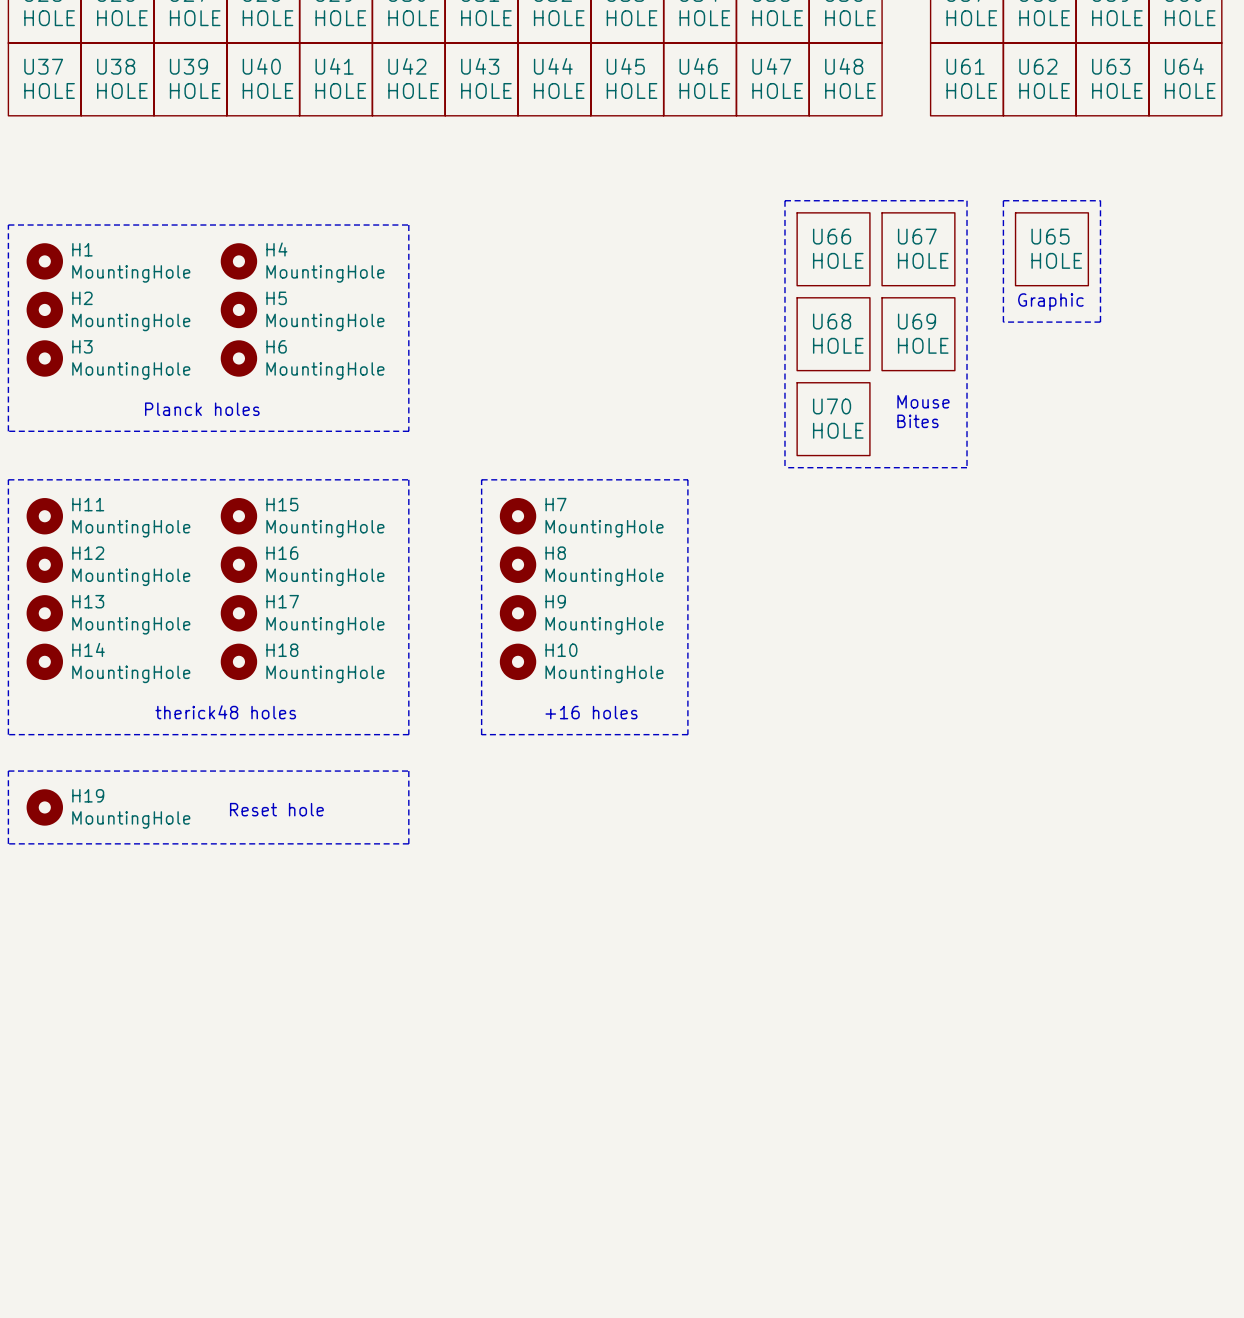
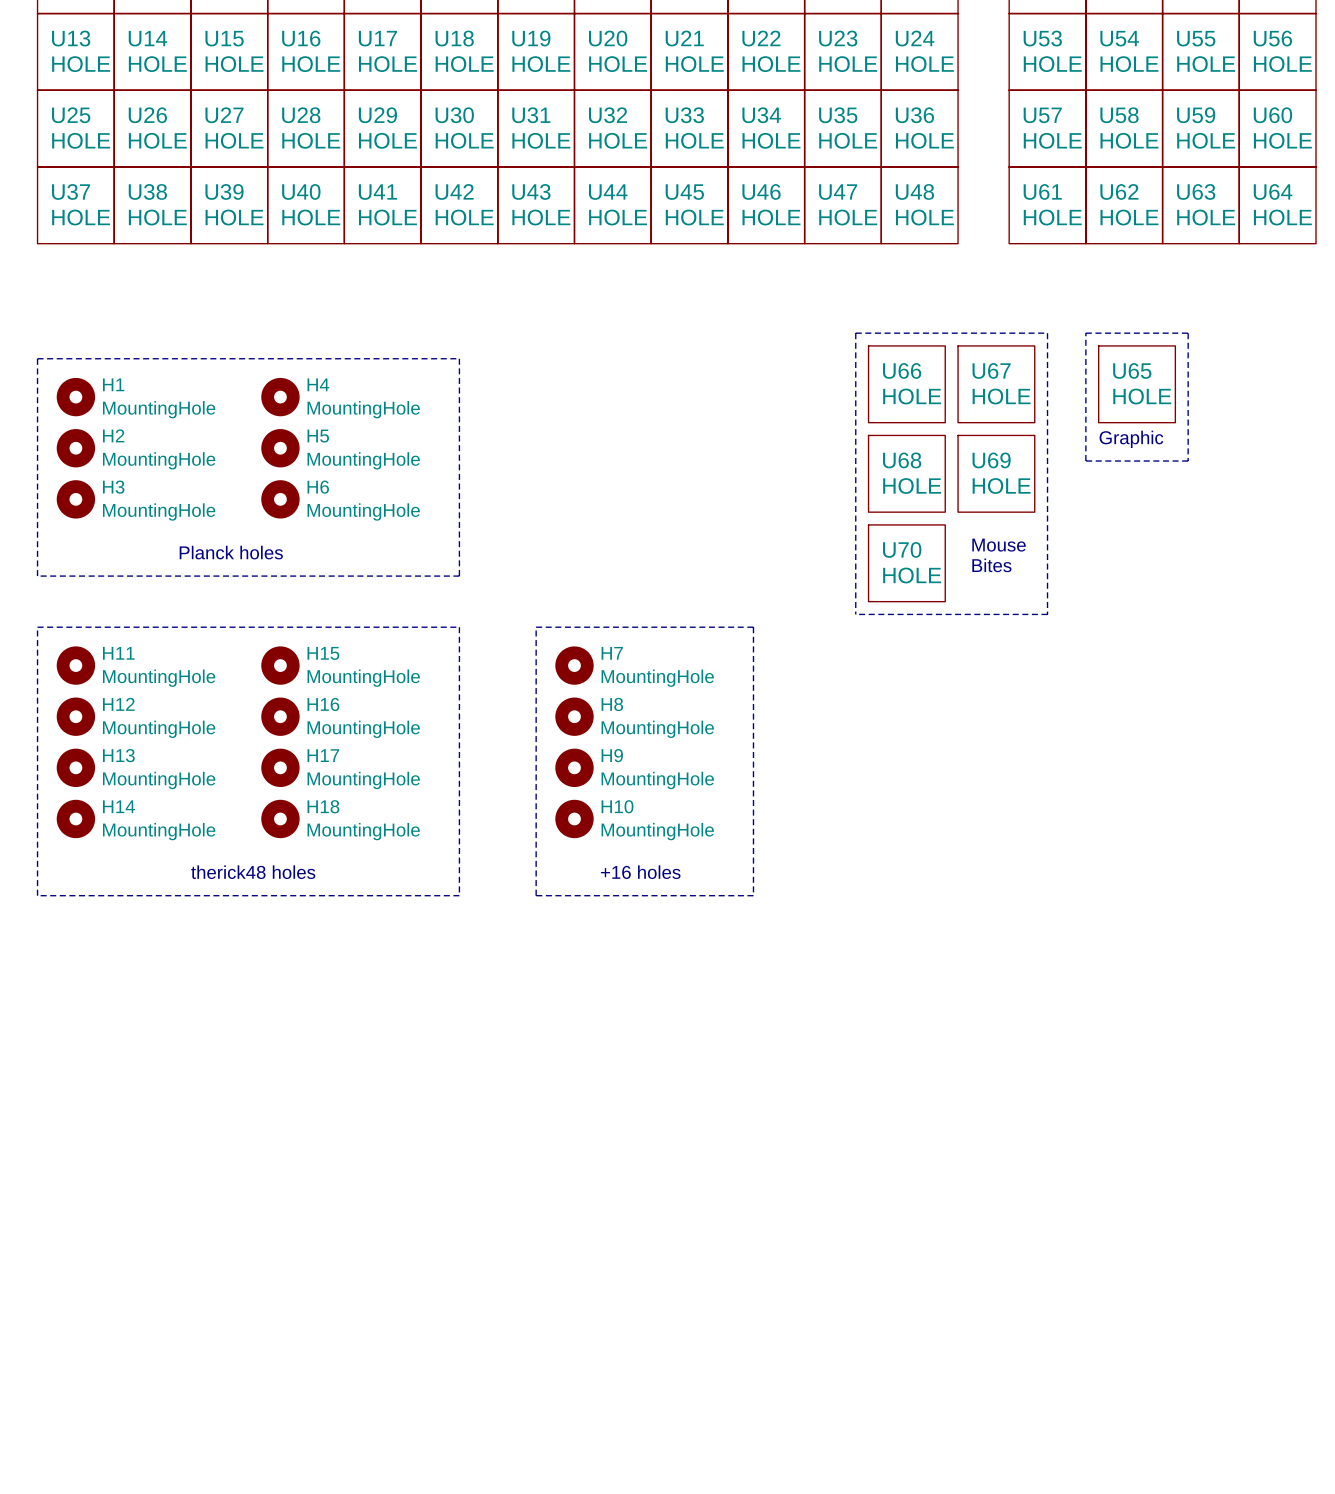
line: (8, 771) (408, 771) (408, 843) (8, 843) (8, 771) -> none
H19: MountingHole (44, 807) -> none
text: Reset hole (276, 809) -> none

